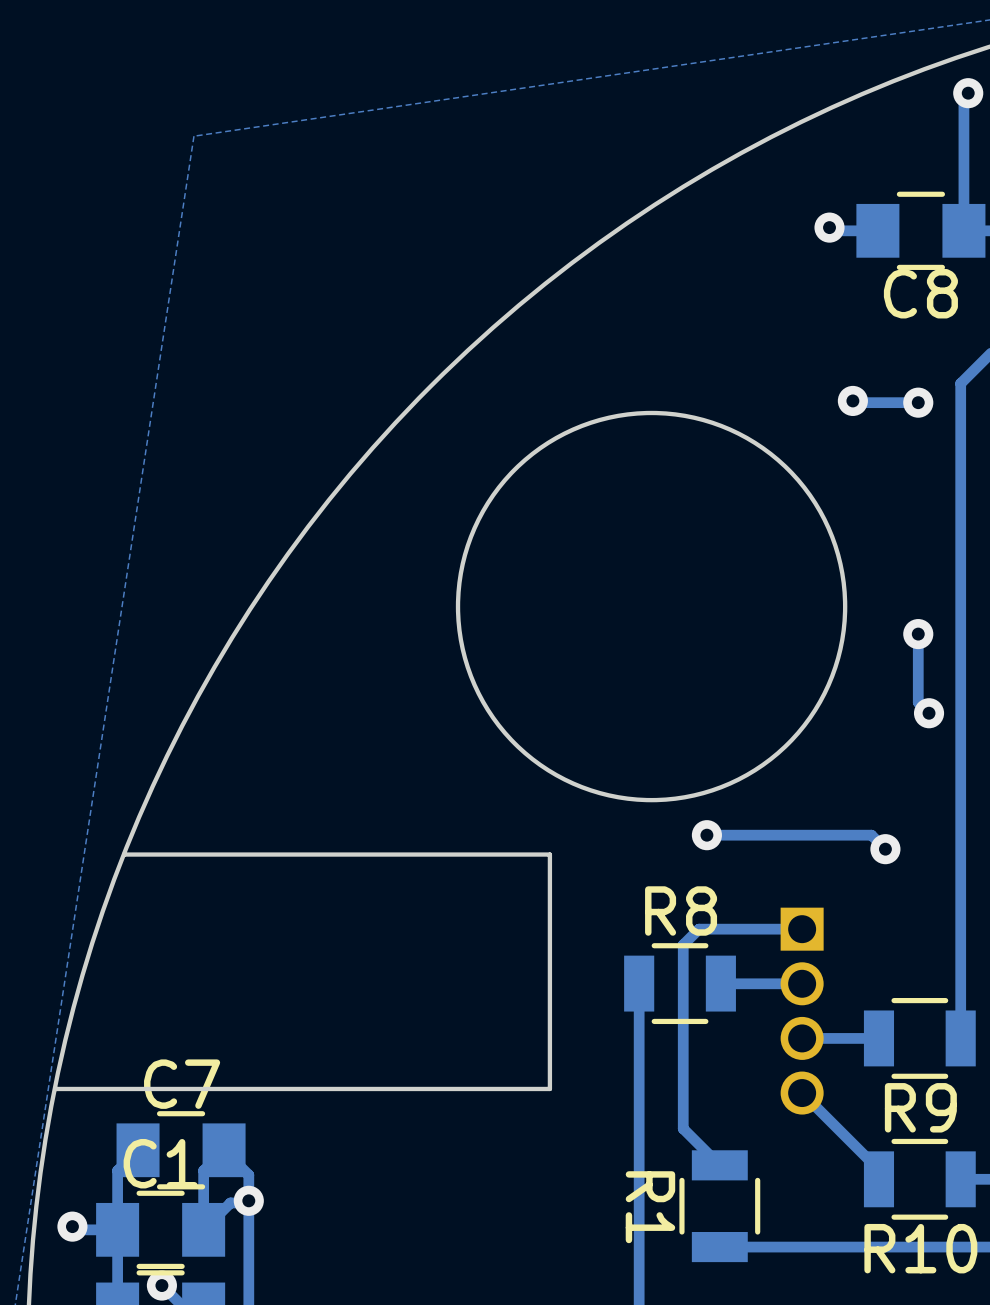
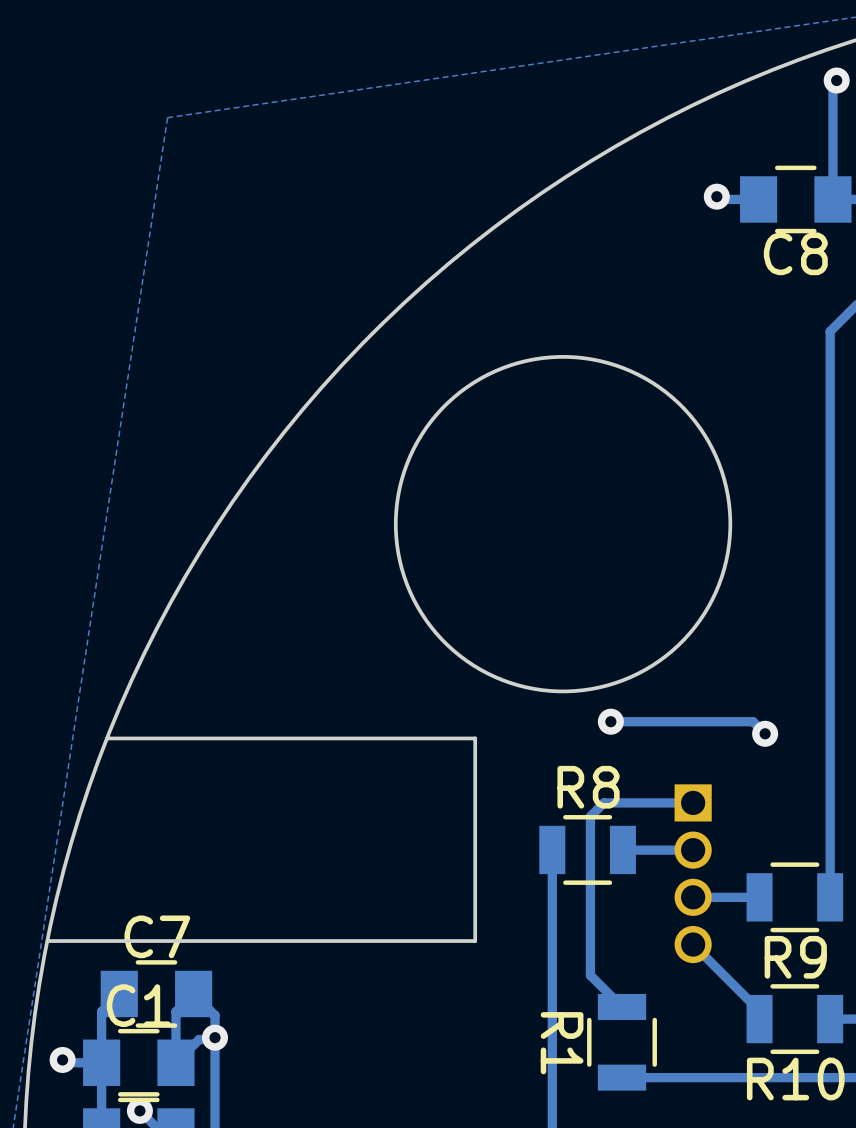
track: (852, 400) (854, 402) (918, 402) -> none
via: (852, 400) -> none
via: (918, 402) -> none
track: (918, 634) (918, 702) (929, 713) -> none
via: (918, 634) -> none
via: (929, 713) -> none

